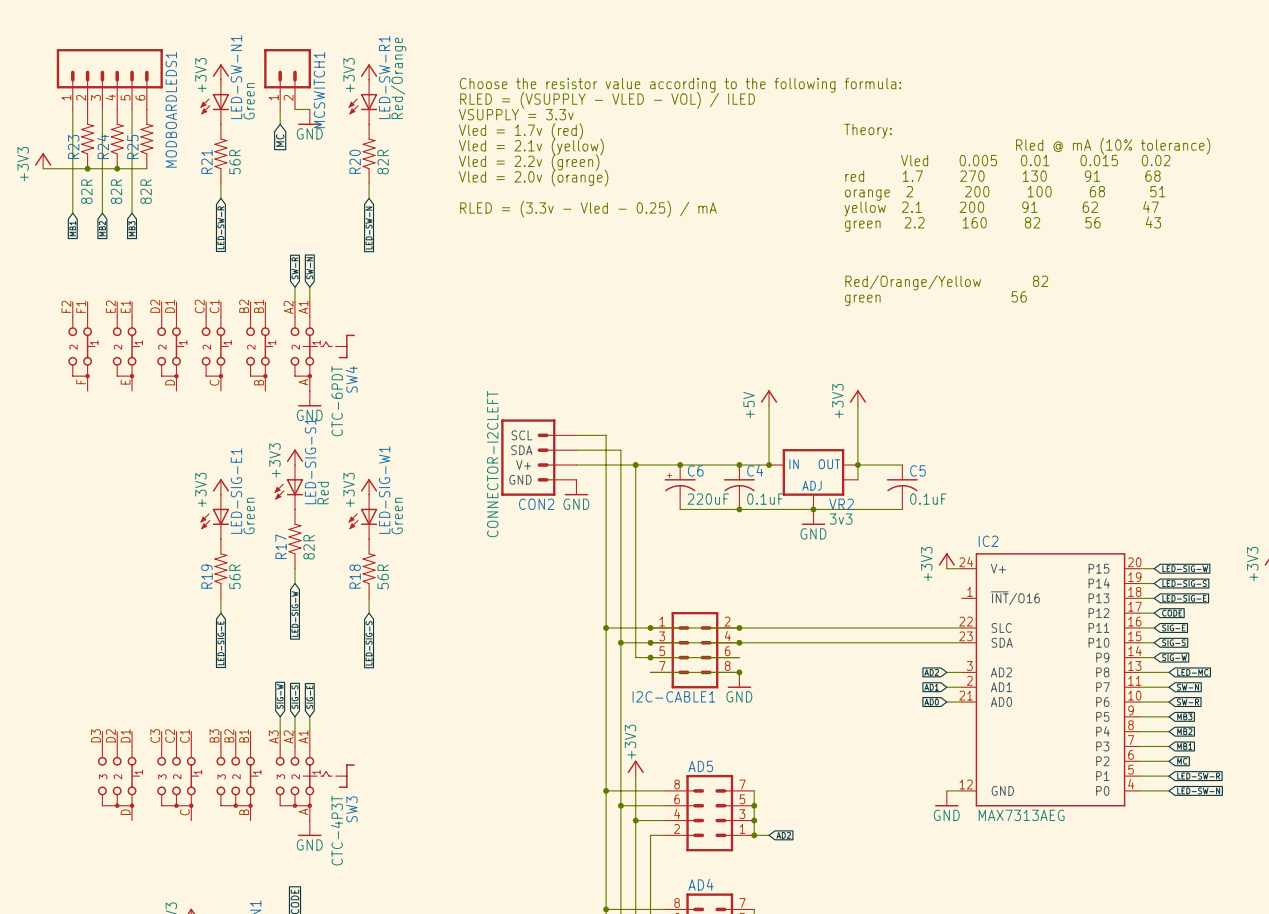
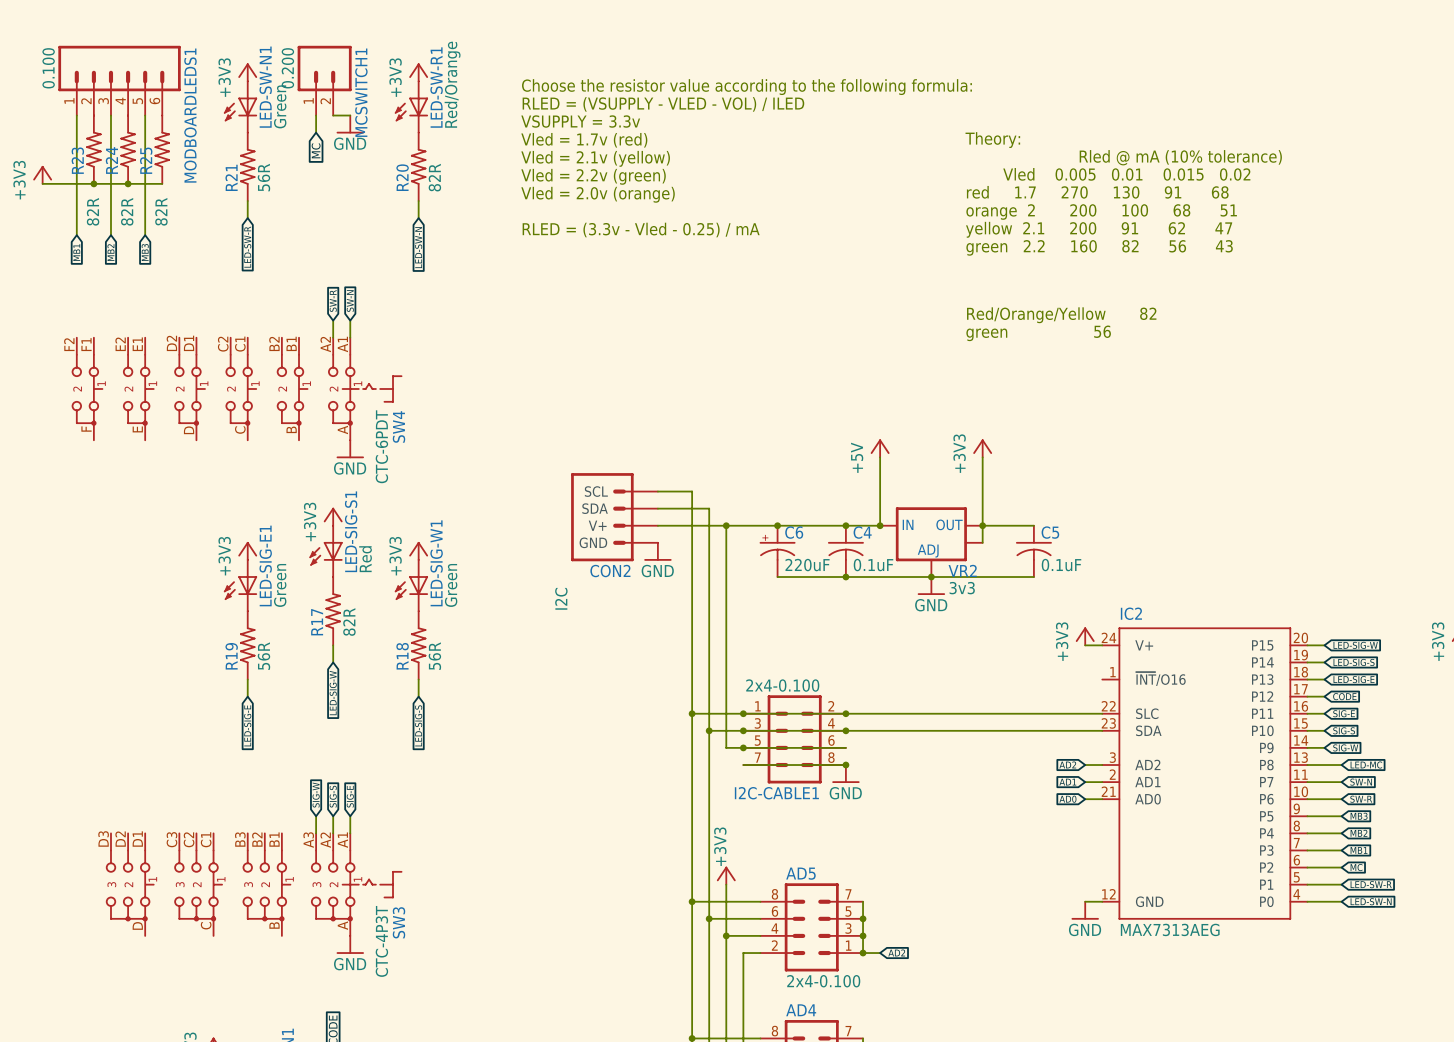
MODBOARDLEDS1 value: none -> 0.100 (48, 68)
MCSWITCH1 value: none -> 0.200 (287, 68)
CON2 value: CONNECTOR-I2CLEFT (492, 464) -> I2C (561, 598)
I2C-CABLE1 value: none -> 2x4-0.100 (782, 685)
AD5 value: none -> 2x4-0.100 (823, 981)

